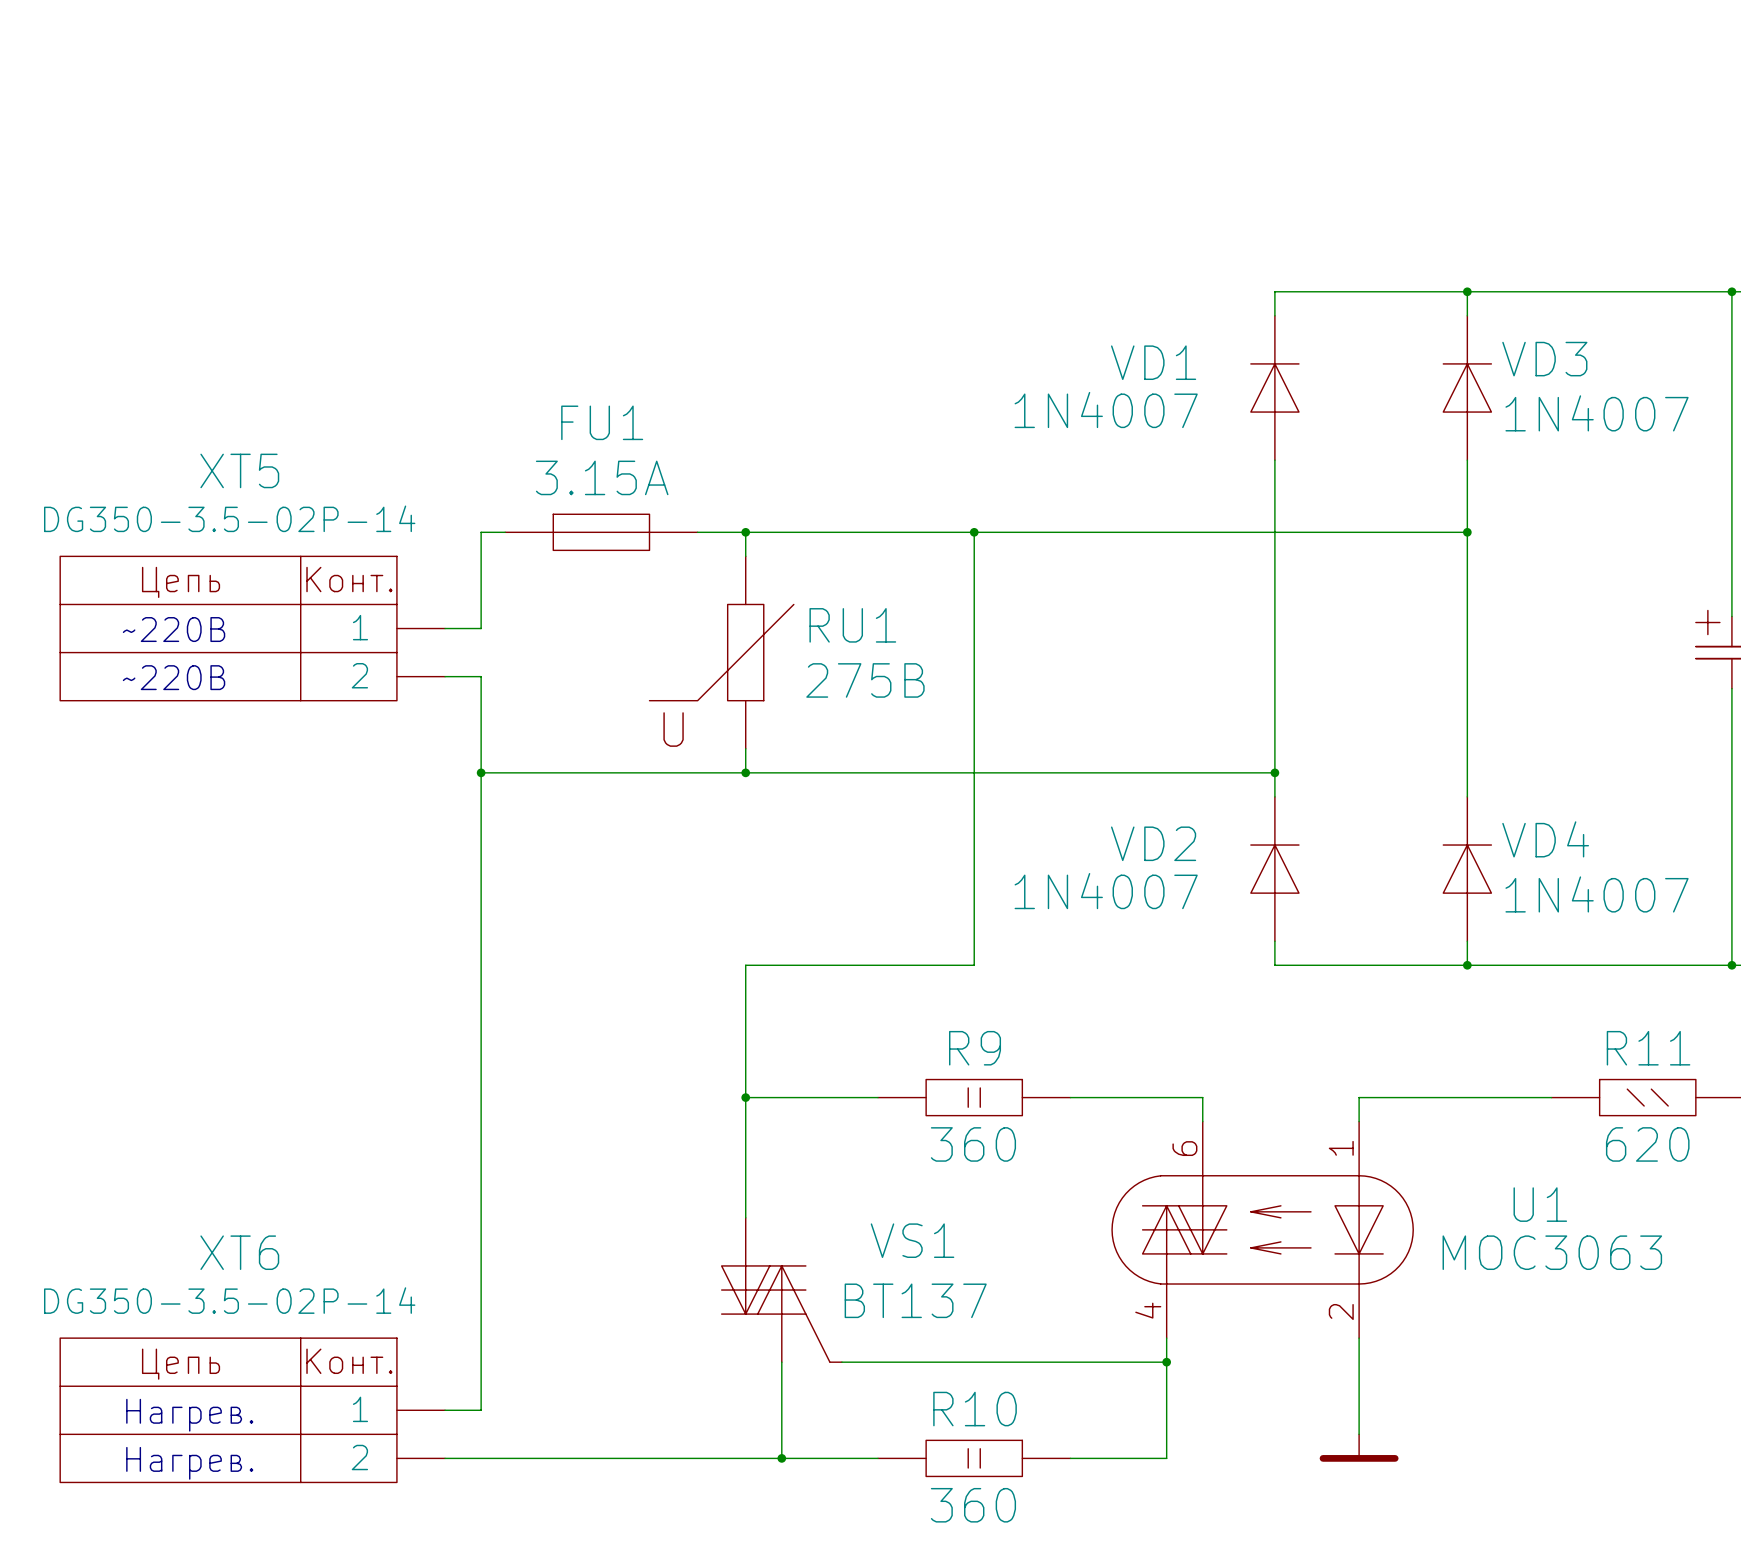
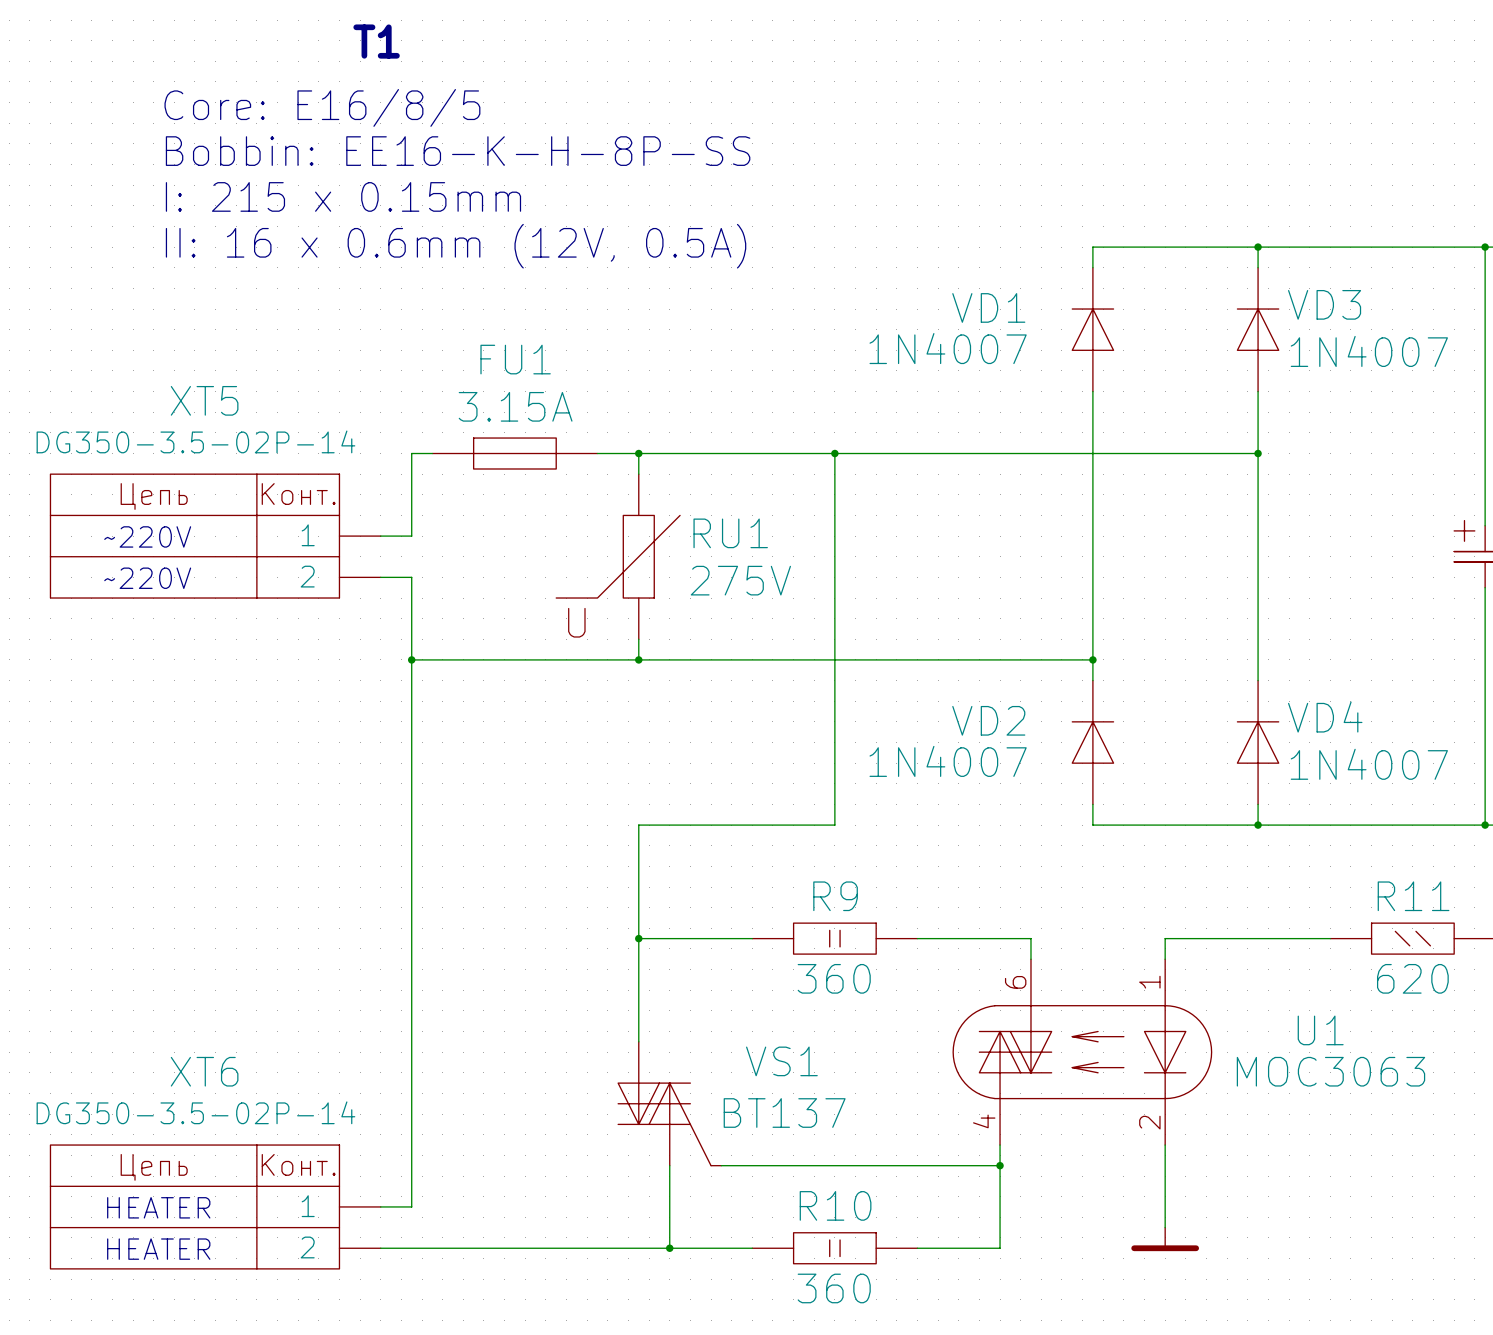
text: none -> T1 (376, 41)
text: none -> Core: E16/8/5 (322, 107)
text: none -> Bobbin: EE16-K-H-8P-SS (458, 151)
text: none -> I: 215 x 0.15mm (343, 196)
text: none -> II: 16 x 0.6mm (12V, 0.5A) (456, 246)
text: ~220В (174, 629) -> ~220V (147, 536)
text: ~220В (174, 677) -> ~220V (147, 578)
RU1 value: 275B (865, 680) -> 275V (740, 580)
text: Нагрев. (189, 1415) -> HEATER (158, 1207)
text: Нагрев. (189, 1463) -> HEATER (158, 1249)

